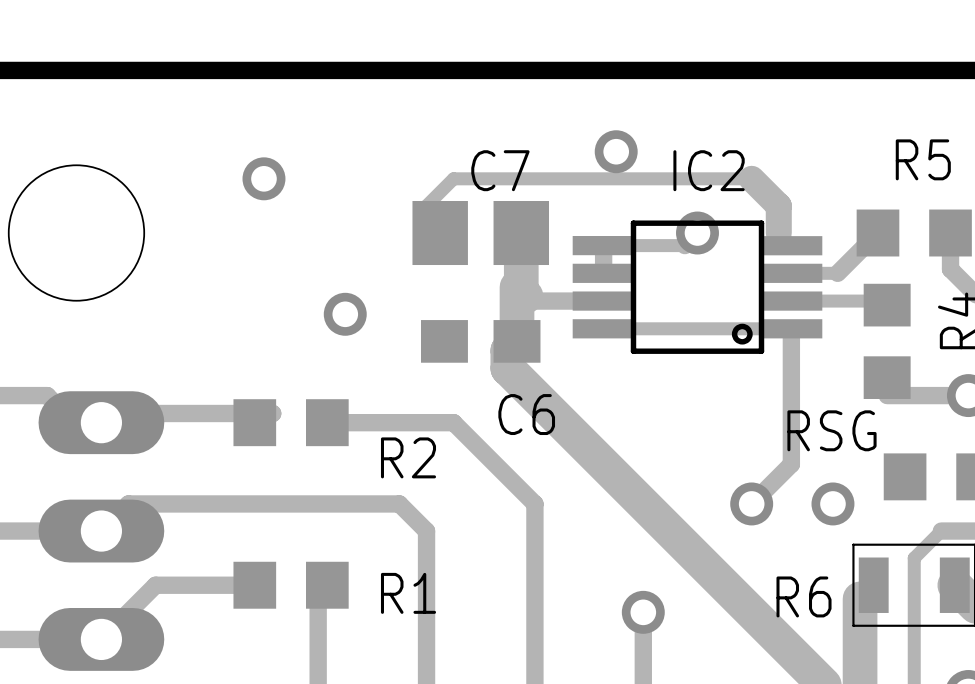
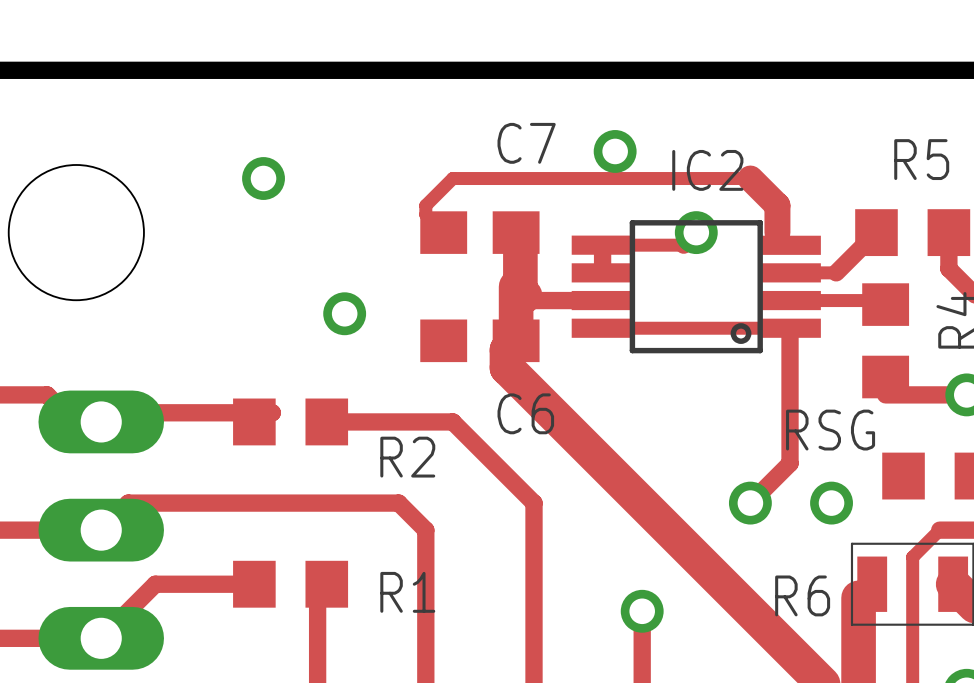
C7 name position: C7 (500, 170) -> C7 (526, 143)
C7 footprint: [412, 201, 550, 266] -> [420, 211, 540, 254]

